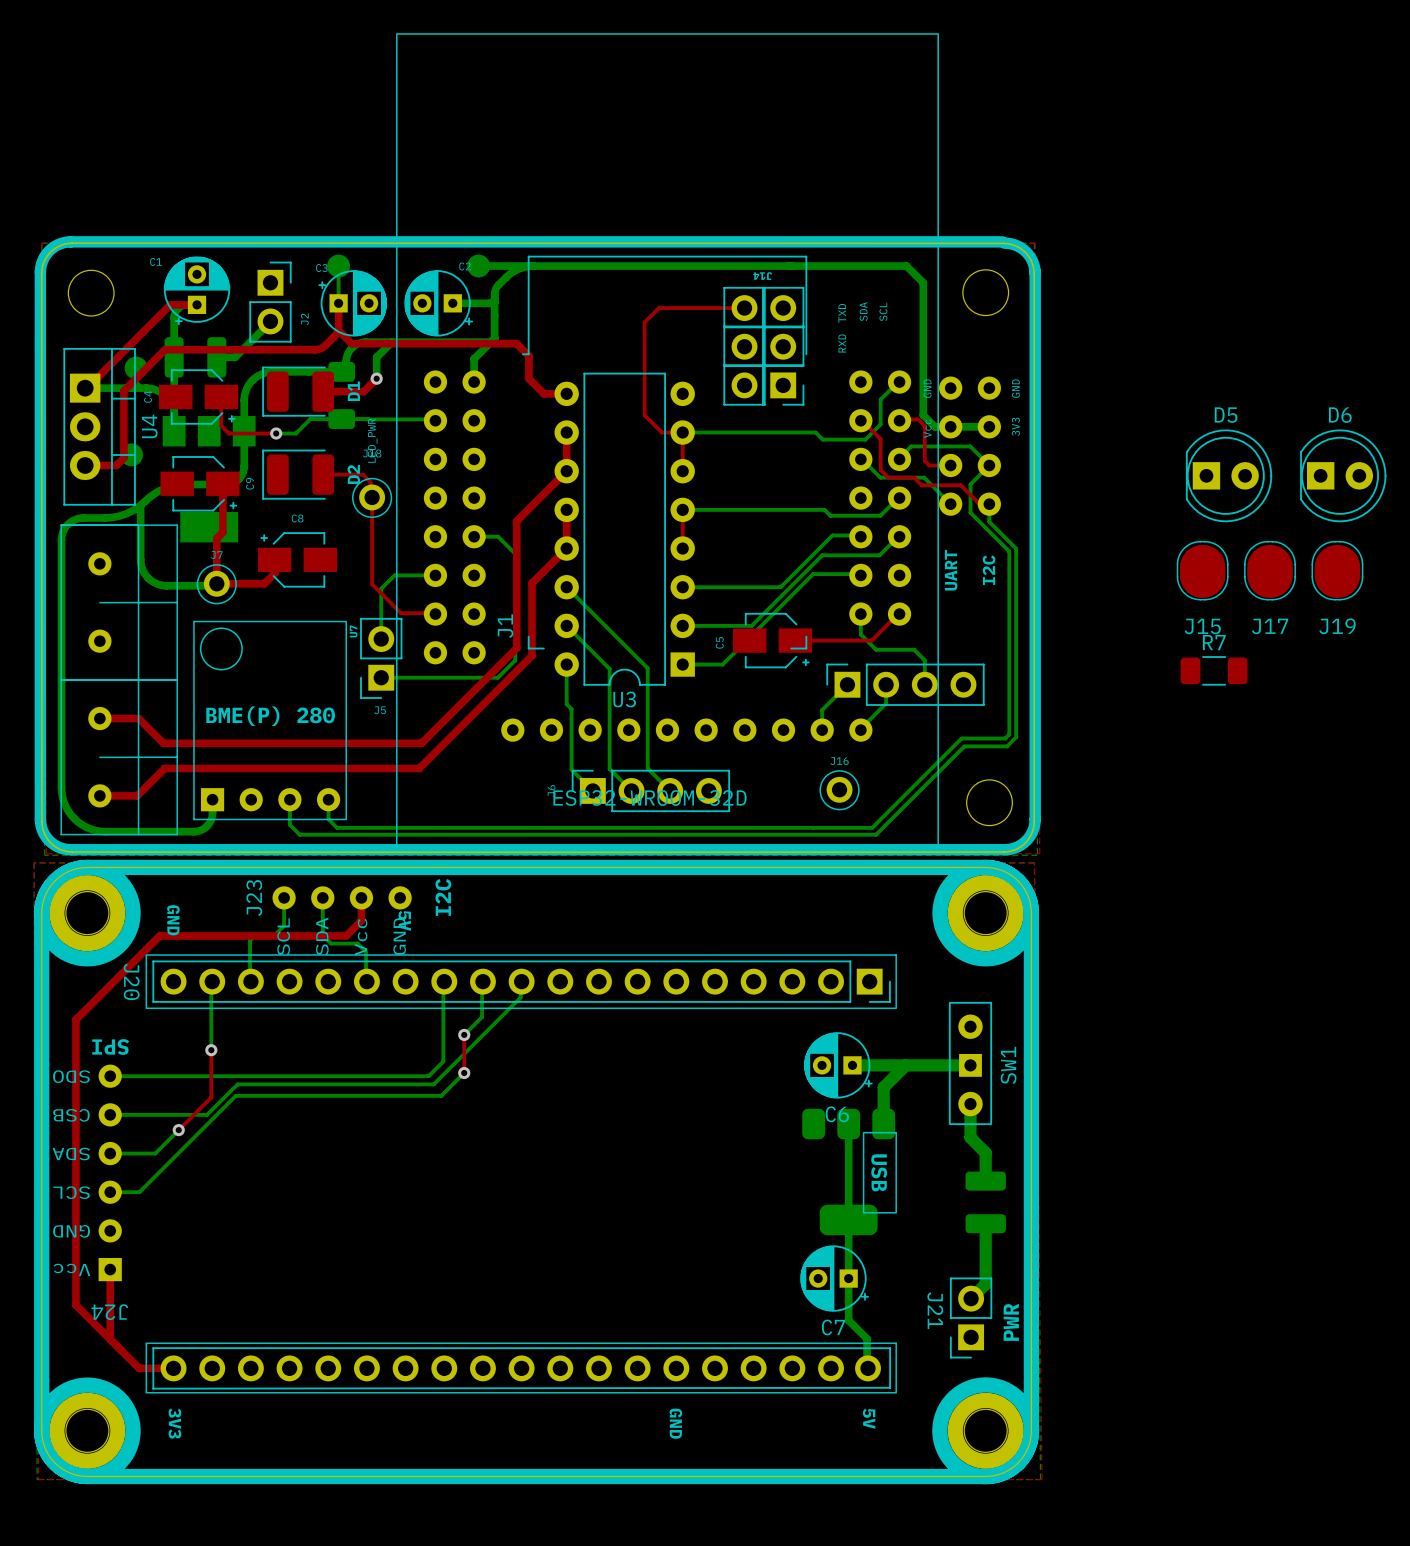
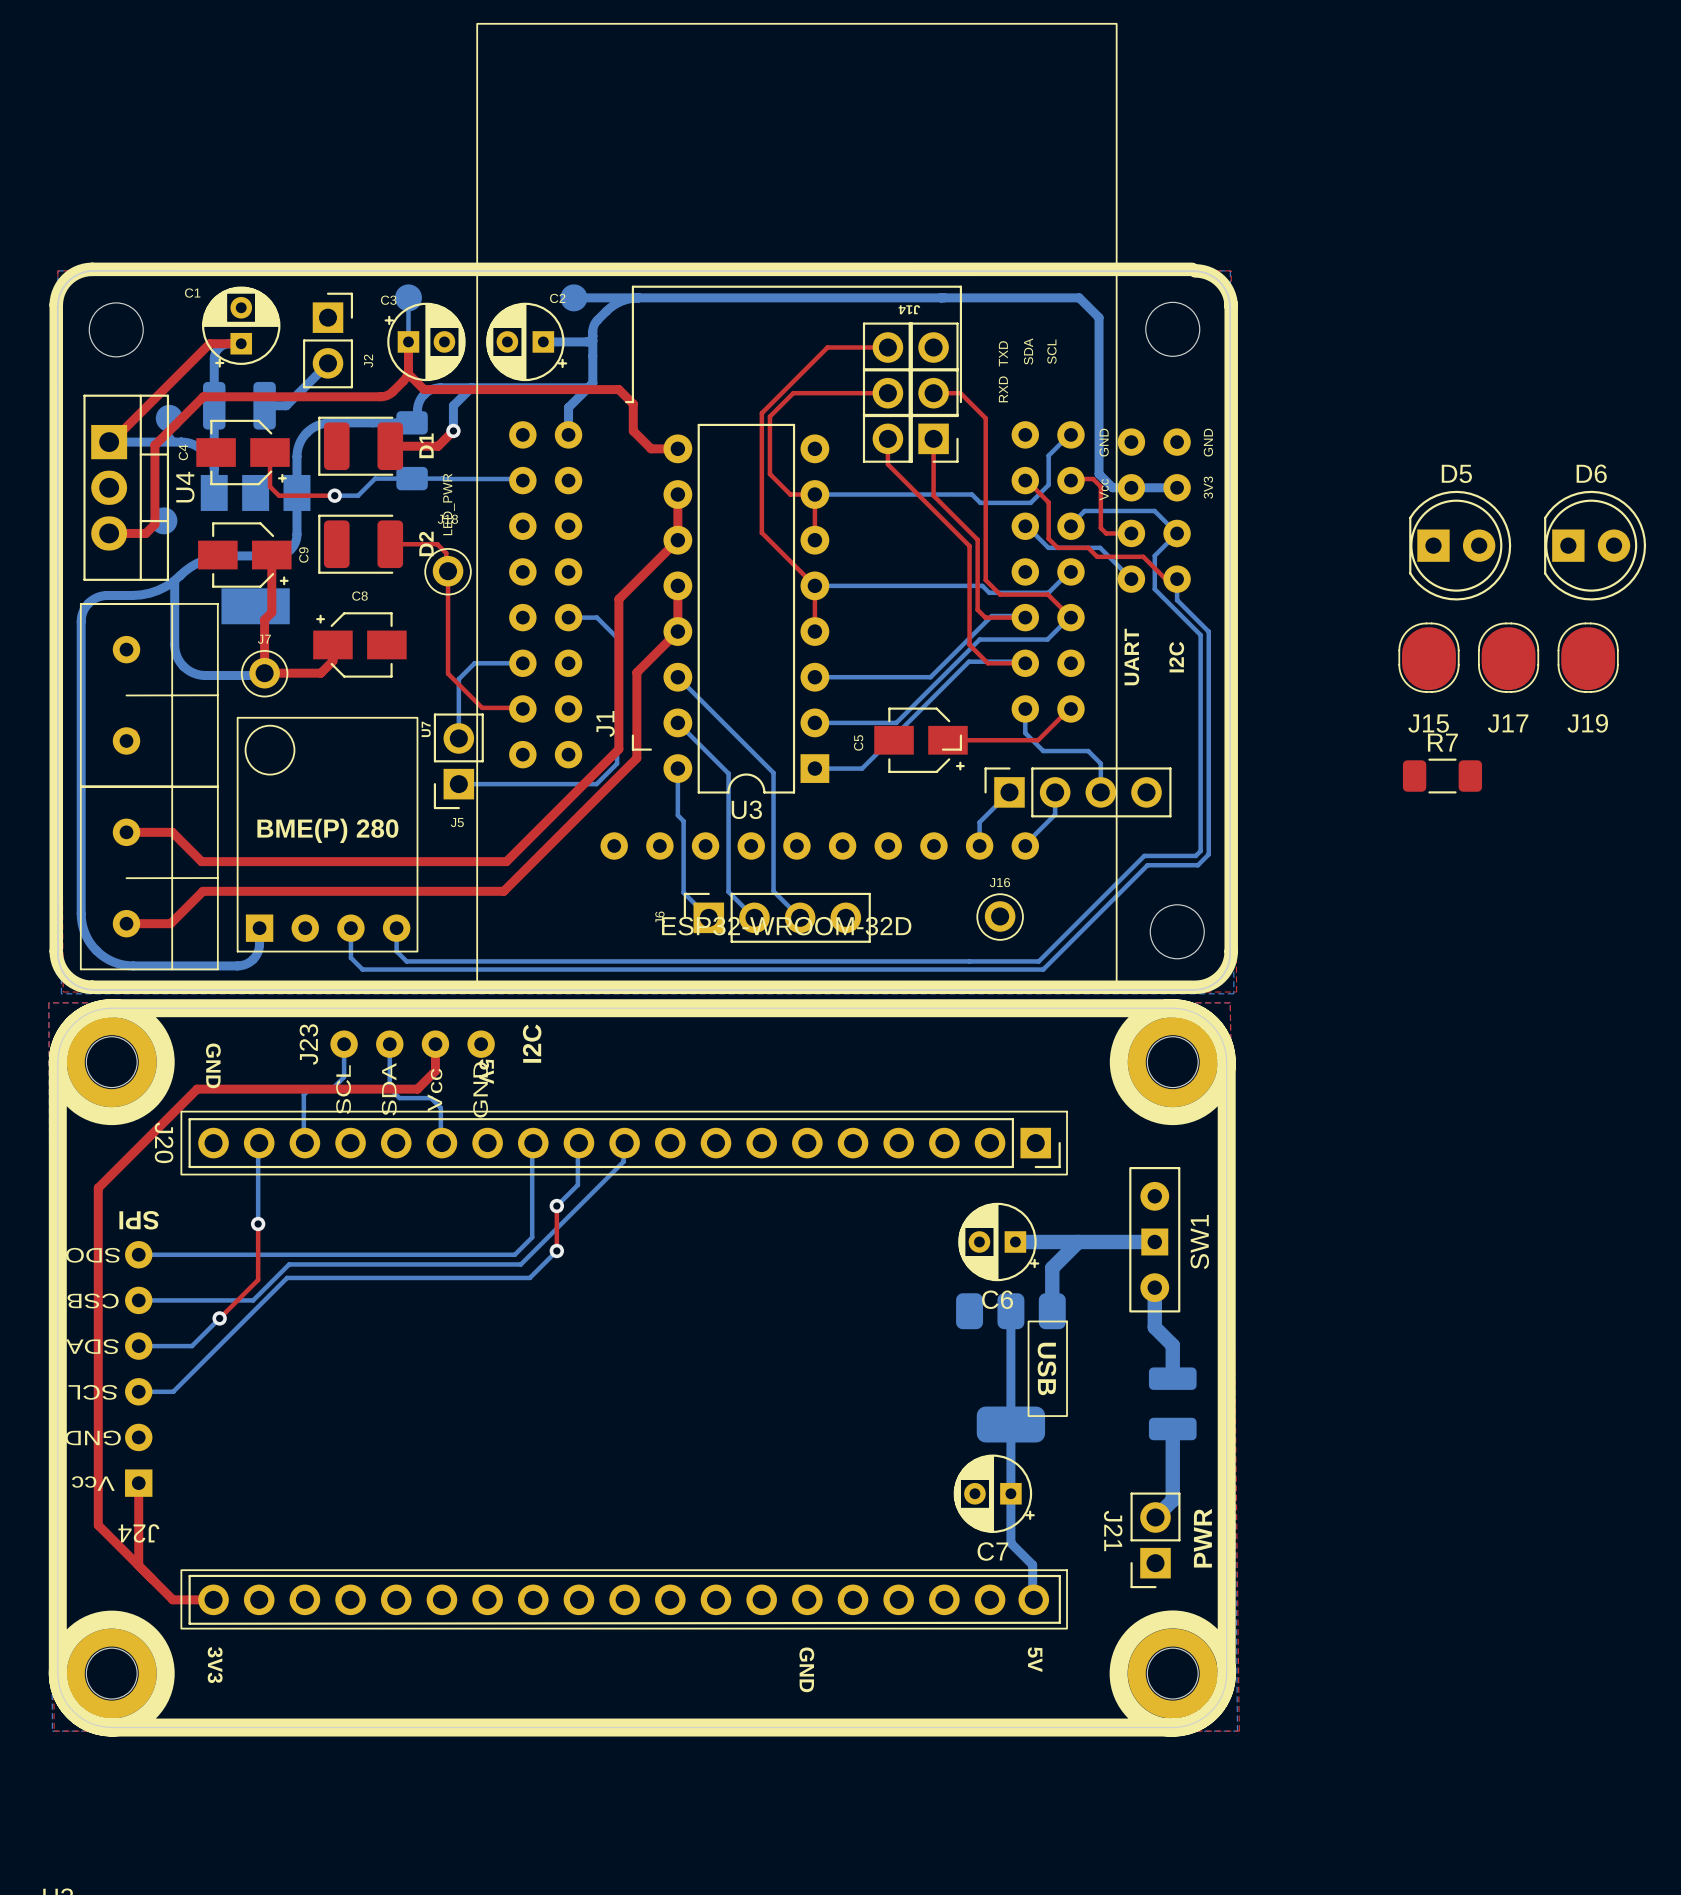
top track: (693, 308) (658, 308) (644, 322) (644, 366) -> (887, 393) (793, 393) (769, 416)
top track: none -> (827, 347) (761, 413) (761, 532) (814, 585)
top track: none -> (933, 393) (960, 393) (985, 418) (985, 580) (1000, 594) (1047, 594) (1070, 617)
top track: none -> (887, 438) (887, 464) (969, 546) (969, 644) (987, 663) (1025, 663)
top track: none -> (933, 438) (933, 495) (977, 539) (977, 609) (985, 617) (1025, 617)

